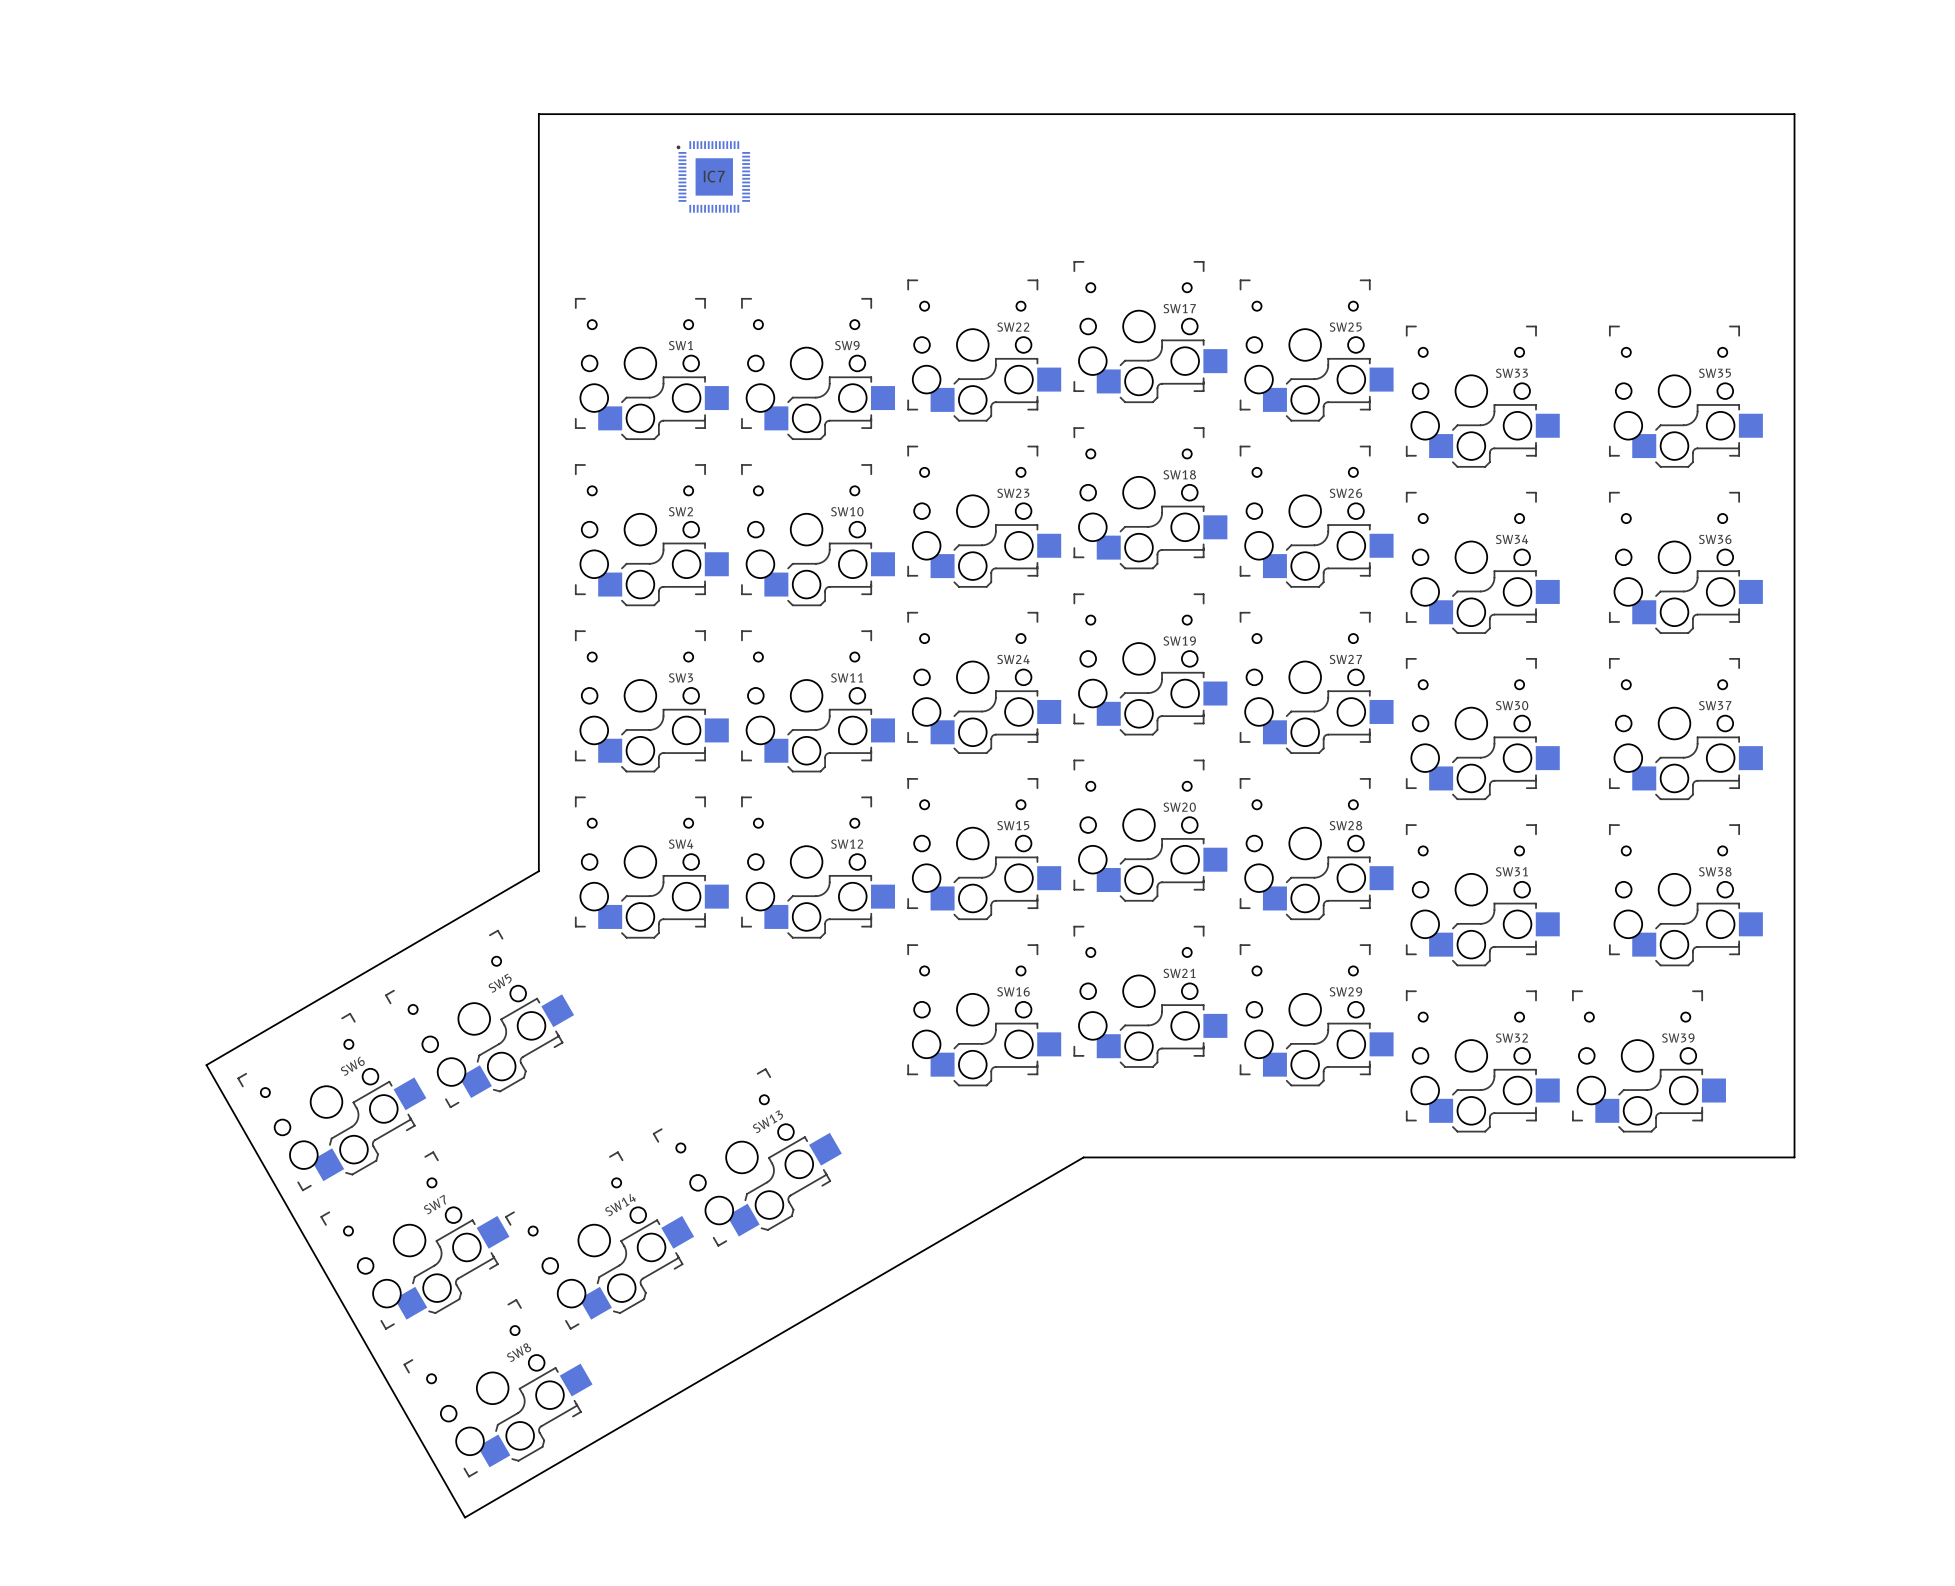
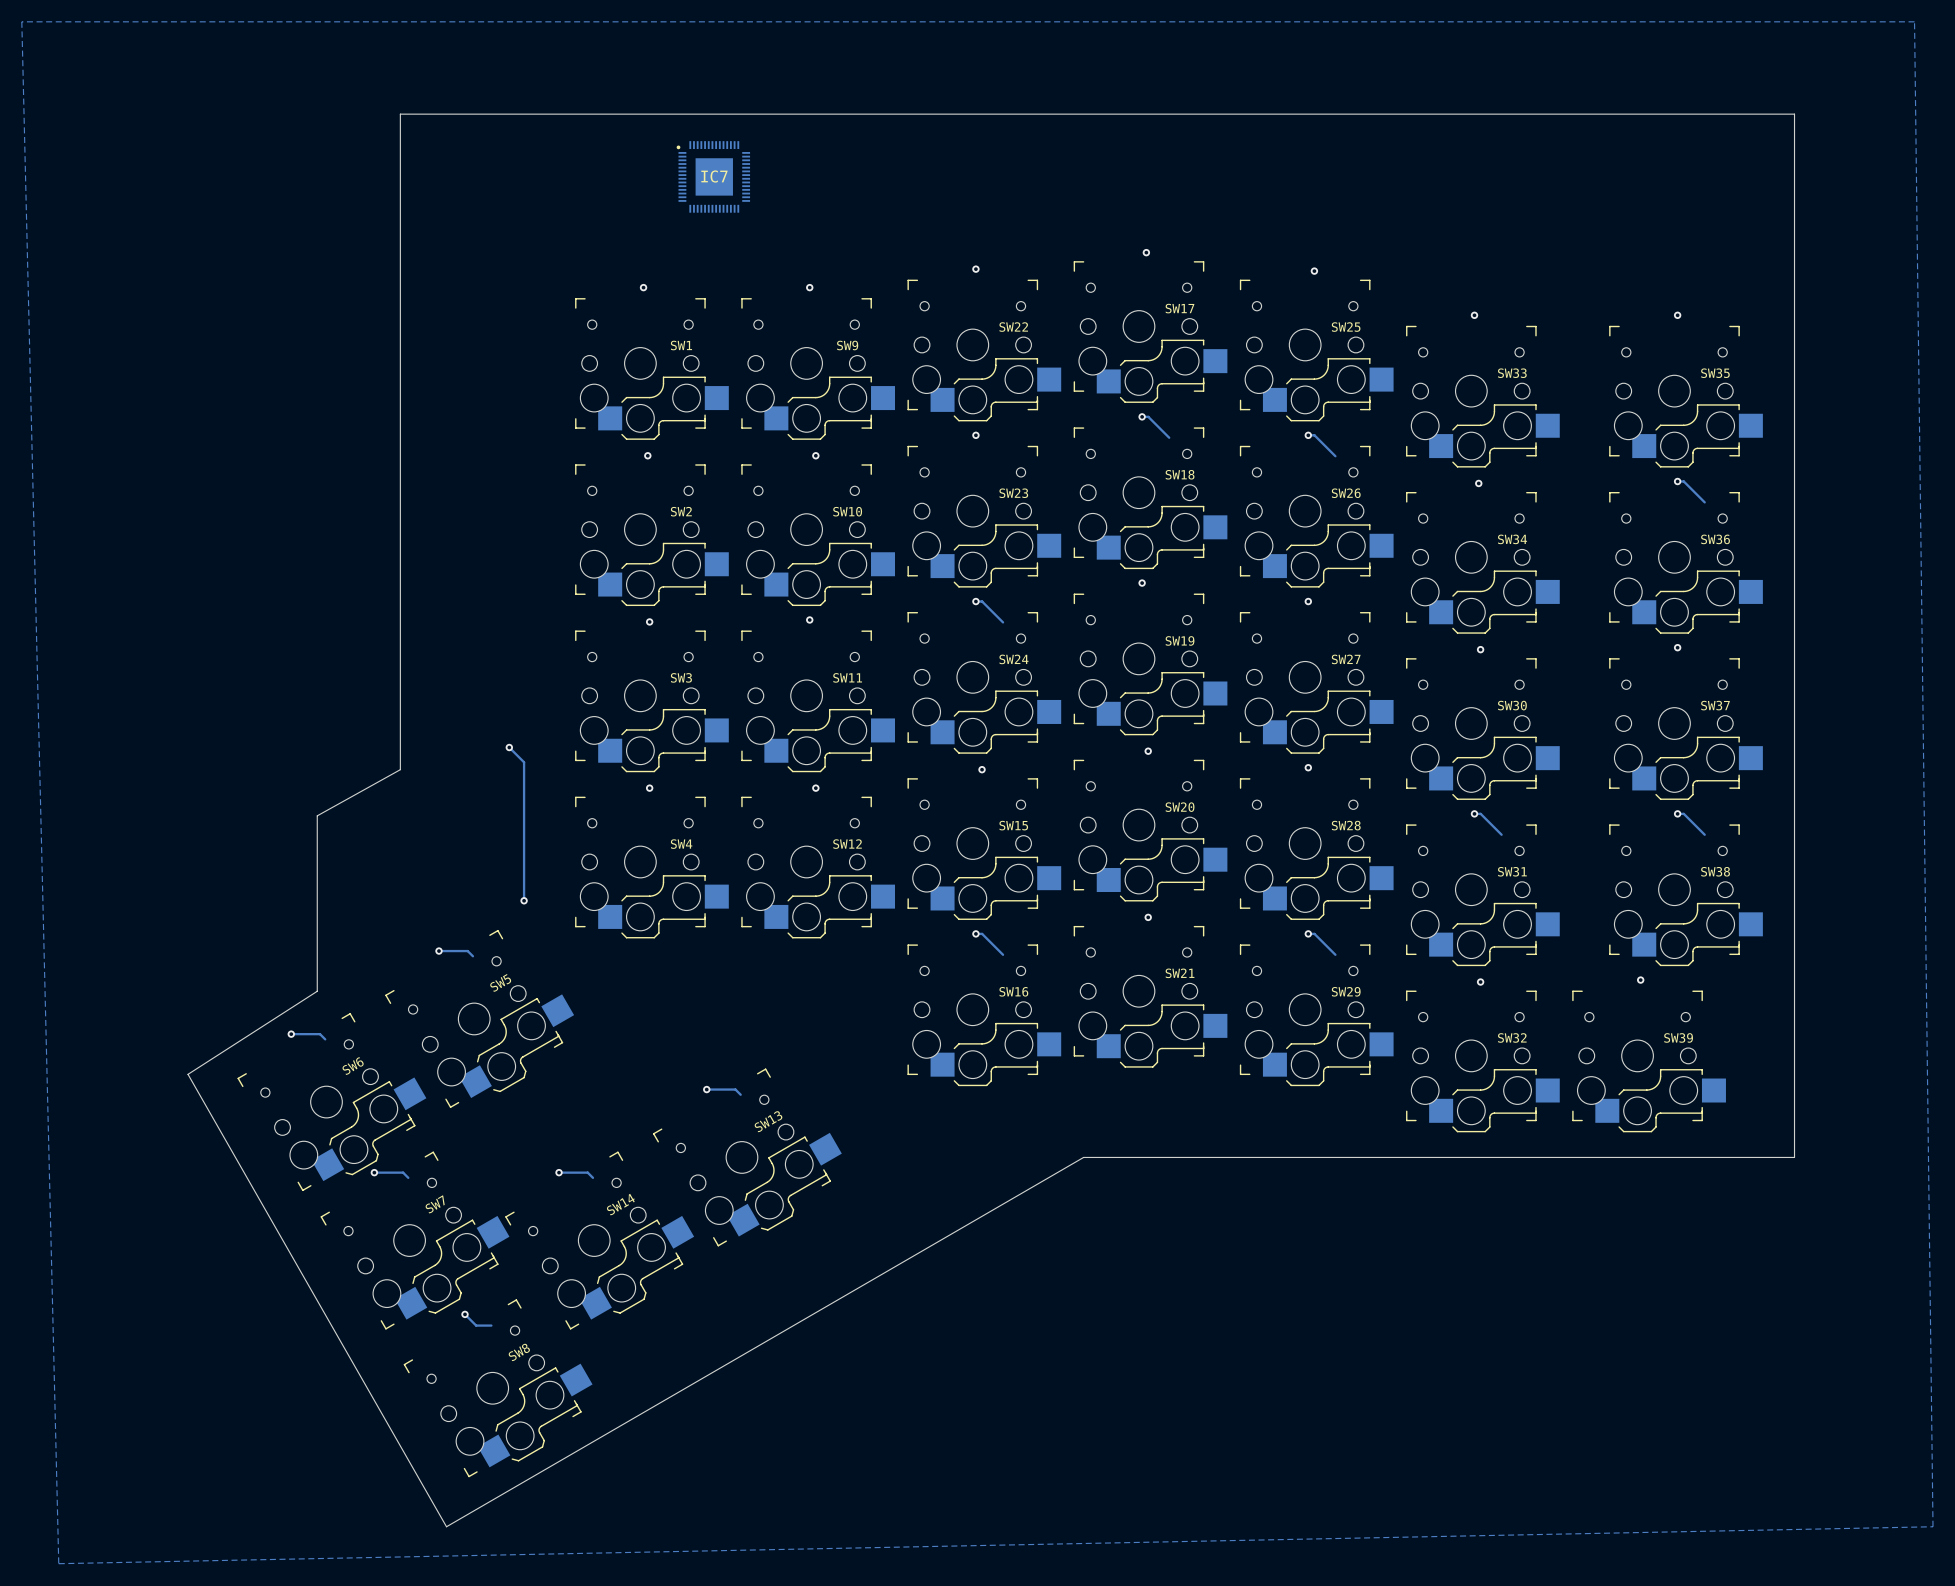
zone outline: none -> (1914, 21) (1933, 1526) (58, 1563) (21, 21) (1914, 21)
board edge: (538, 114) (538, 871) (206, 1065) (464, 1517) (1083, 1157) -> (538, 114) (400, 114) (400, 769) (317, 815) (317, 991) (188, 1074) (446, 1526) (1083, 1157)
via: none -> (1146, 252)
via: none -> (975, 269)
via: none -> (1314, 271)
via: none -> (643, 287)
via: none -> (809, 287)
via: none -> (1474, 315)
via: none -> (1677, 315)
track: none -> (1142, 416) (1148, 416) (1169, 437)
via: none -> (1142, 416)
via: none -> (975, 435)
track: none -> (1308, 435) (1314, 435) (1335, 456)
via: none -> (1308, 435)
via: none -> (647, 455)
via: none -> (815, 455)
track: none -> (1677, 481) (1683, 481) (1704, 502)
via: none -> (1677, 481)
via: none -> (1478, 483)
via: none -> (1142, 583)
track: none -> (975, 601) (982, 601) (1003, 622)
via: none -> (975, 601)
via: none -> (1308, 601)
via: none -> (809, 619)
via: none -> (649, 621)
via: none -> (1677, 647)
via: none -> (1480, 649)
track: none -> (509, 747) (524, 762) (524, 900)
via: none -> (509, 747)
via: none -> (1148, 751)
via: none -> (1308, 767)
via: none -> (982, 769)
via: none -> (649, 788)
via: none -> (815, 788)
track: none -> (1474, 813) (1480, 813) (1501, 834)
via: none -> (1474, 813)
track: none -> (1677, 813) (1683, 813) (1704, 834)
via: none -> (1677, 813)
via: none -> (524, 900)
via: none -> (1148, 917)
track: none -> (975, 933) (982, 933) (1003, 954)
via: none -> (975, 933)
track: none -> (1308, 933) (1314, 933) (1335, 954)
via: none -> (1308, 933)
track: none -> (439, 951) (467, 951) (472, 956)
via: none -> (439, 951)
via: none -> (1640, 980)
via: none -> (1480, 982)
track: none -> (291, 1034) (320, 1034) (325, 1039)
via: none -> (291, 1034)
track: none -> (706, 1089) (735, 1089) (740, 1094)
via: none -> (706, 1089)
track: none -> (374, 1172) (403, 1172) (408, 1177)
via: none -> (374, 1172)
track: none -> (559, 1172) (587, 1172) (592, 1177)
via: none -> (559, 1172)
track: none -> (464, 1314) (476, 1325) (491, 1325)
via: none -> (464, 1314)

